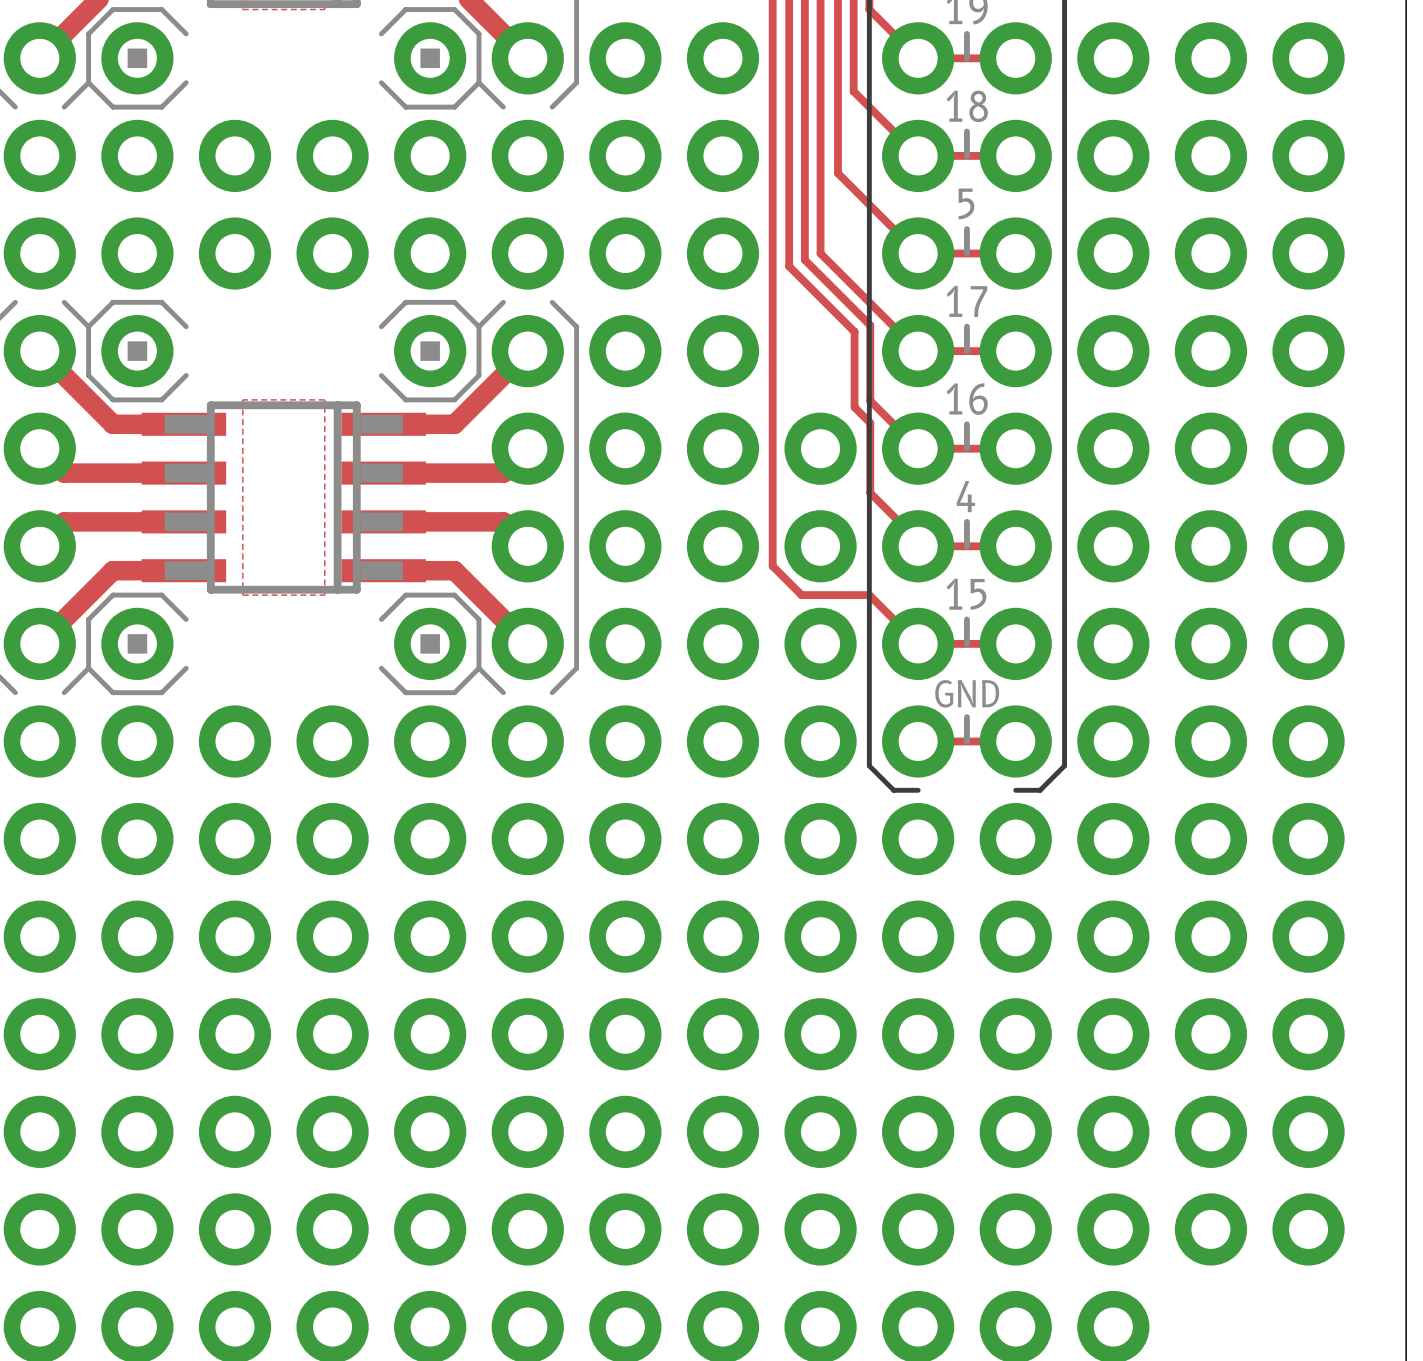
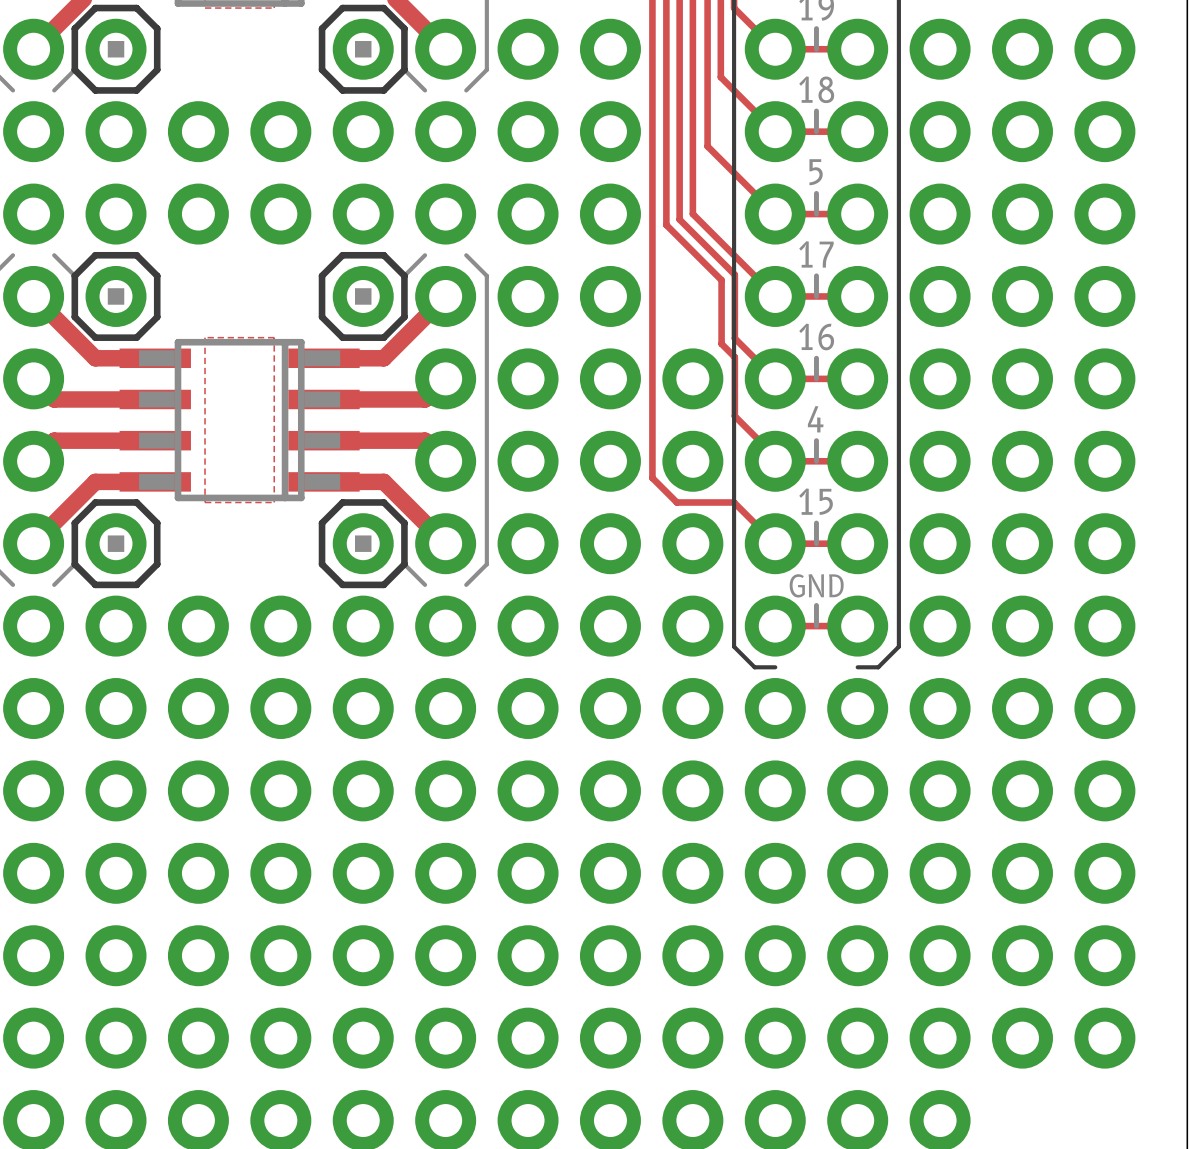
part footprint: [101, 22, 174, 95] -> [71, 4, 161, 94]
part footprint: [394, 22, 467, 95] -> [318, 4, 408, 94]
part footprint: [101, 315, 174, 388] -> [71, 251, 161, 341]
part footprint: [394, 315, 467, 388] -> [318, 251, 408, 341]
part footprint: [101, 607, 174, 681] -> [71, 499, 161, 589]
part footprint: [394, 607, 467, 681] -> [318, 499, 408, 589]

